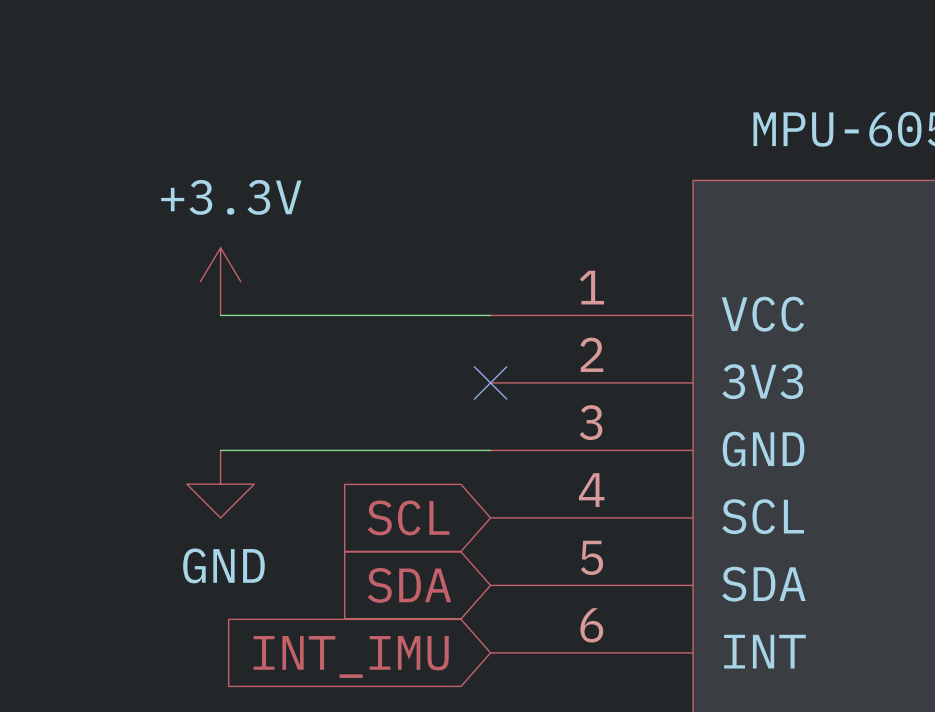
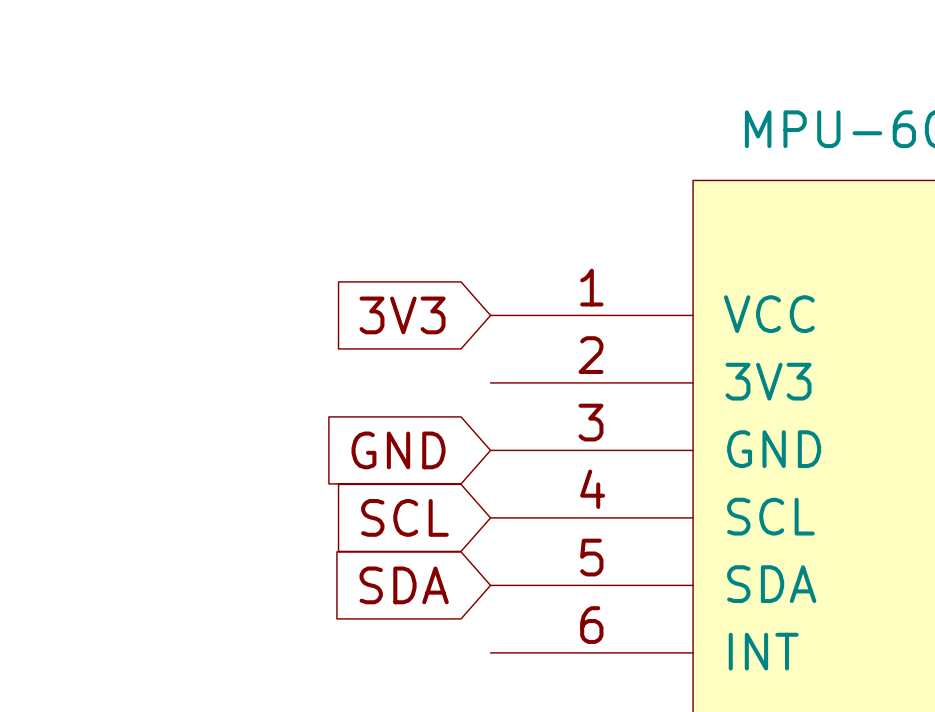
power symbol: +3.3V (220, 281) -> none
wire: (220, 315) (490, 315) -> none
global label: none -> 3V3 (402, 315)
no-connect mark: (490, 382) -> none
wire: (220, 450) (490, 450) -> none
global label: none -> GND (398, 450)
power symbol: GND (220, 484) -> none
global label: INT_IMU (351, 656) -> none

